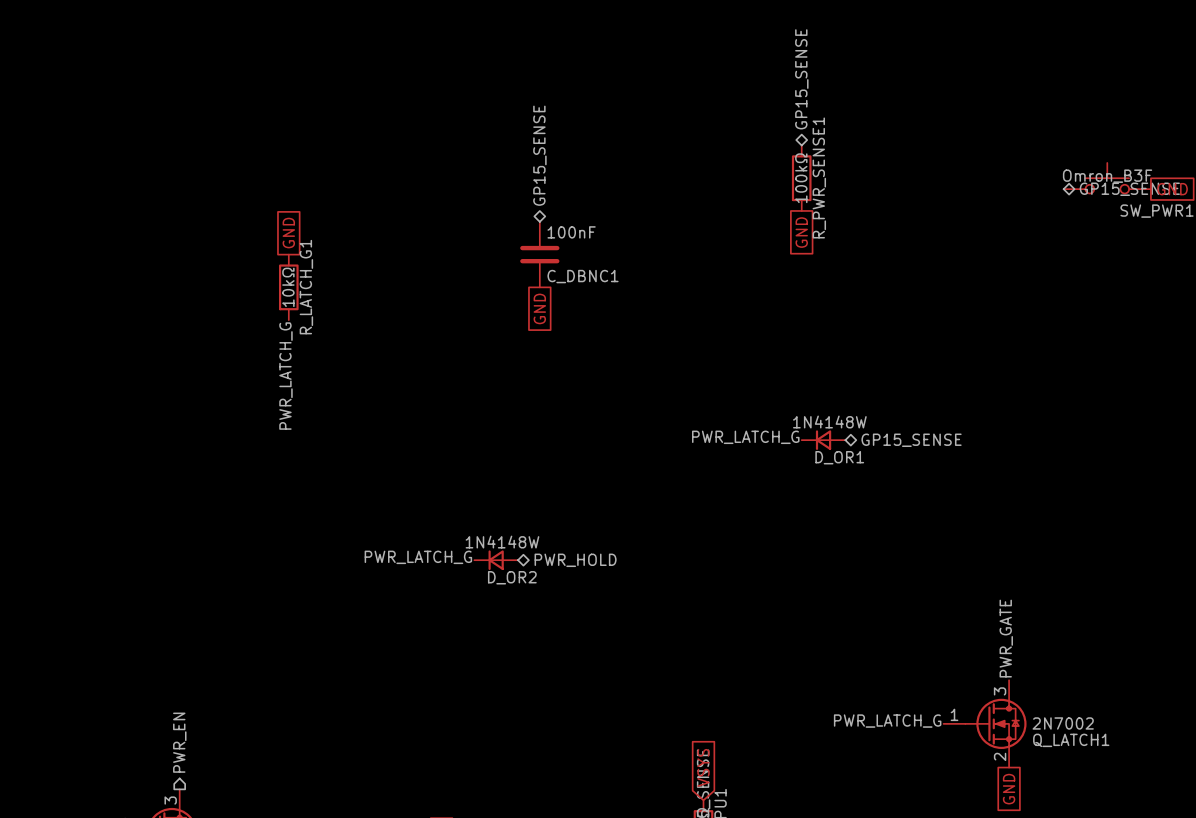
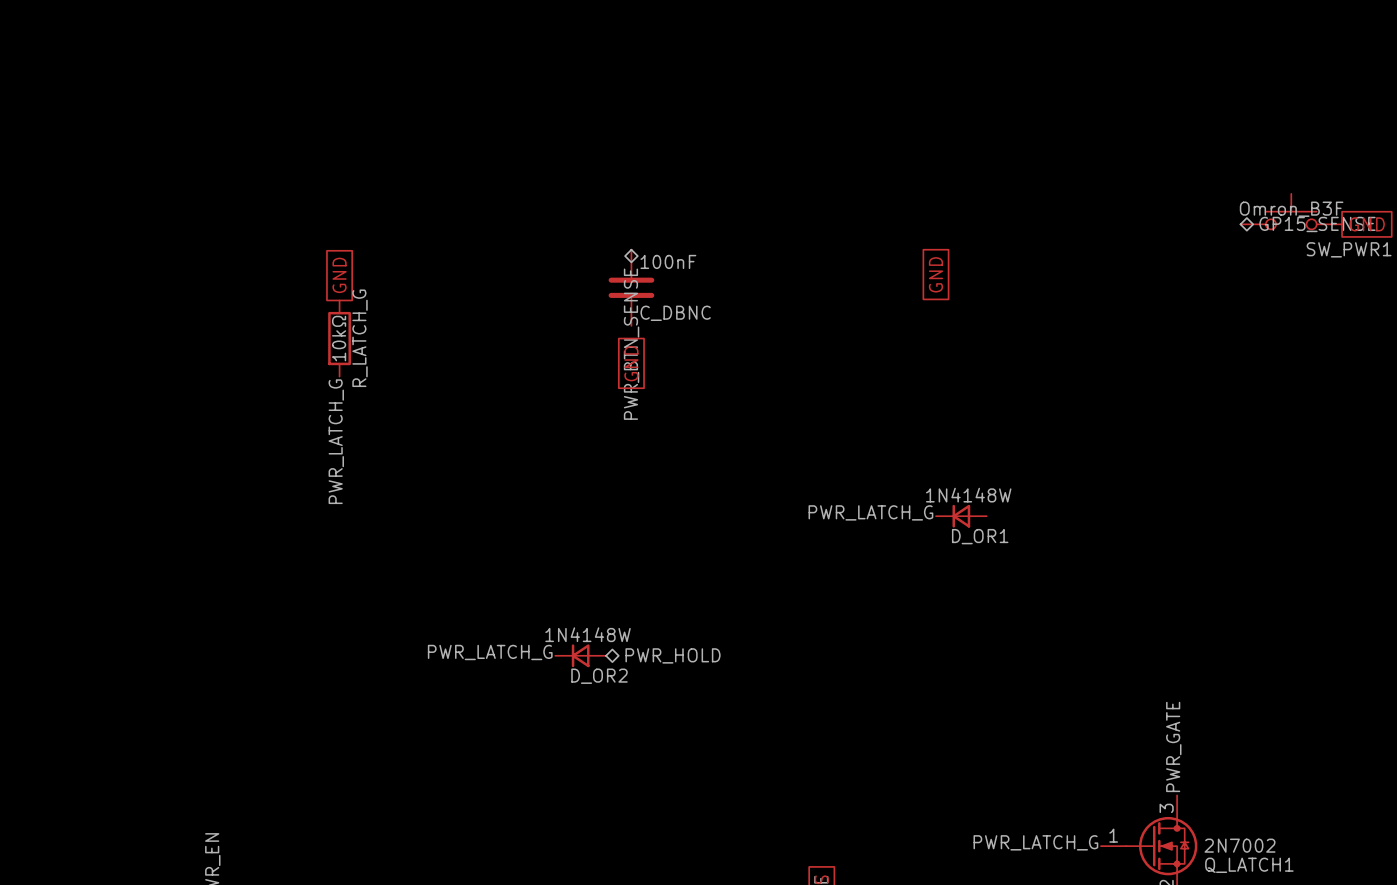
hierarchical label: GP15_SENSE (801, 79) -> none
hierarchical label: GP15_SENSE (539, 155) -> none
R_PWR_SENSE1: 100kΩ (801, 178) -> none
C_DBNC: none -> 100nF (631, 287)
C_DBNC1: 100nF (539, 254) -> none
R_LATCH_G1 name: R_LATCH_G1 (306, 287) -> R_LATCH_G (360, 338)
hierarchical label: none -> PWR_BTN_SENSE (631, 344)
hierarchical label: GP15_SENSE (911, 440) -> none

